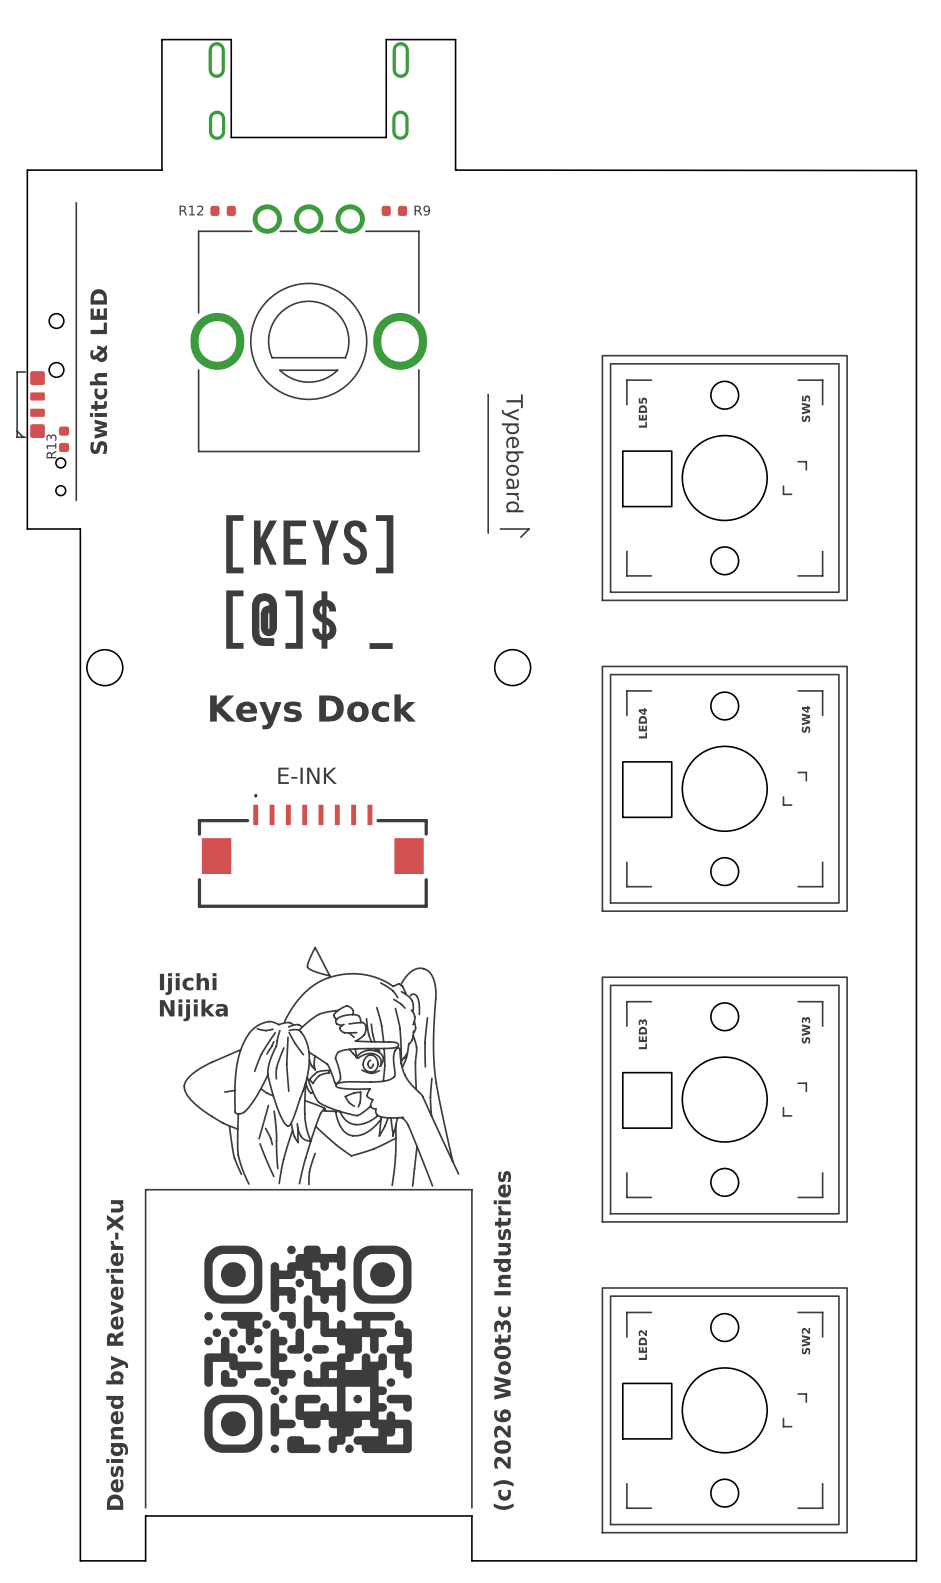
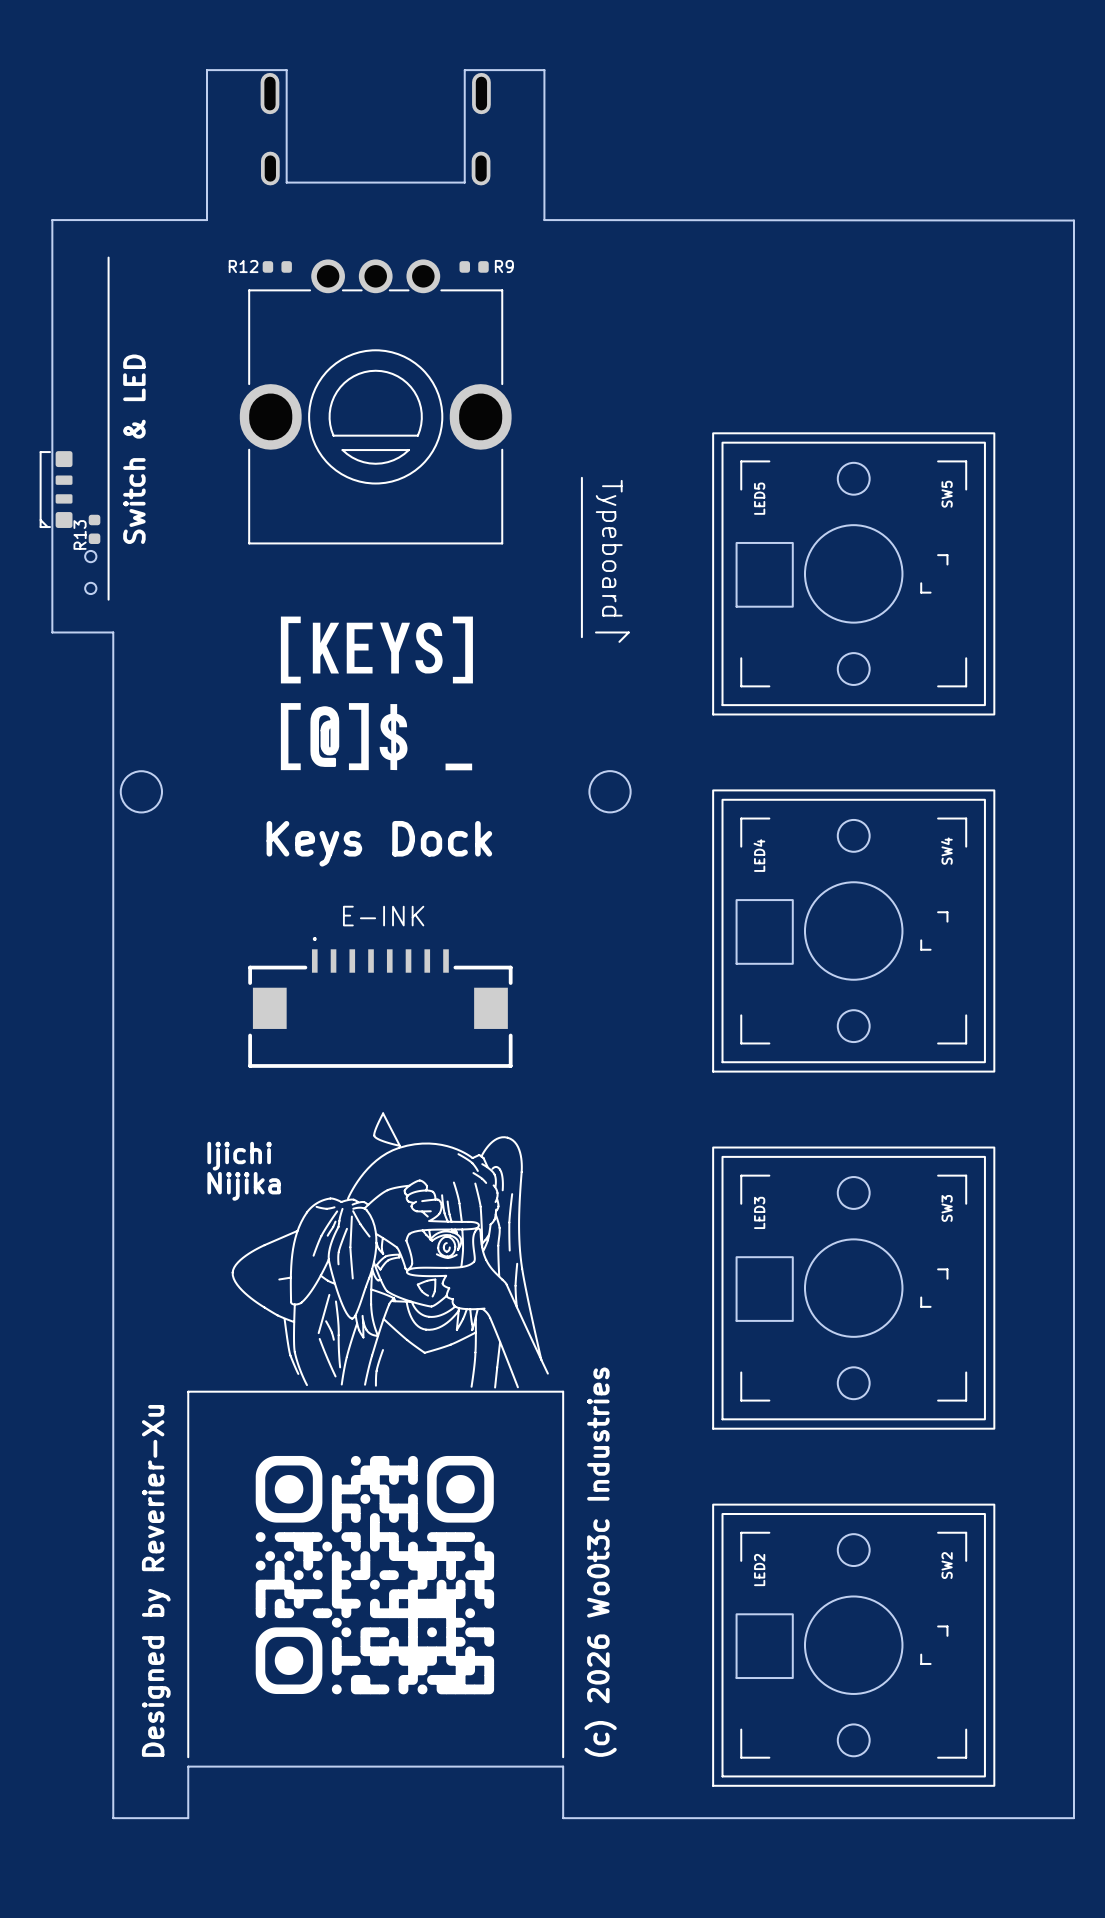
part: (56, 345) -> none

